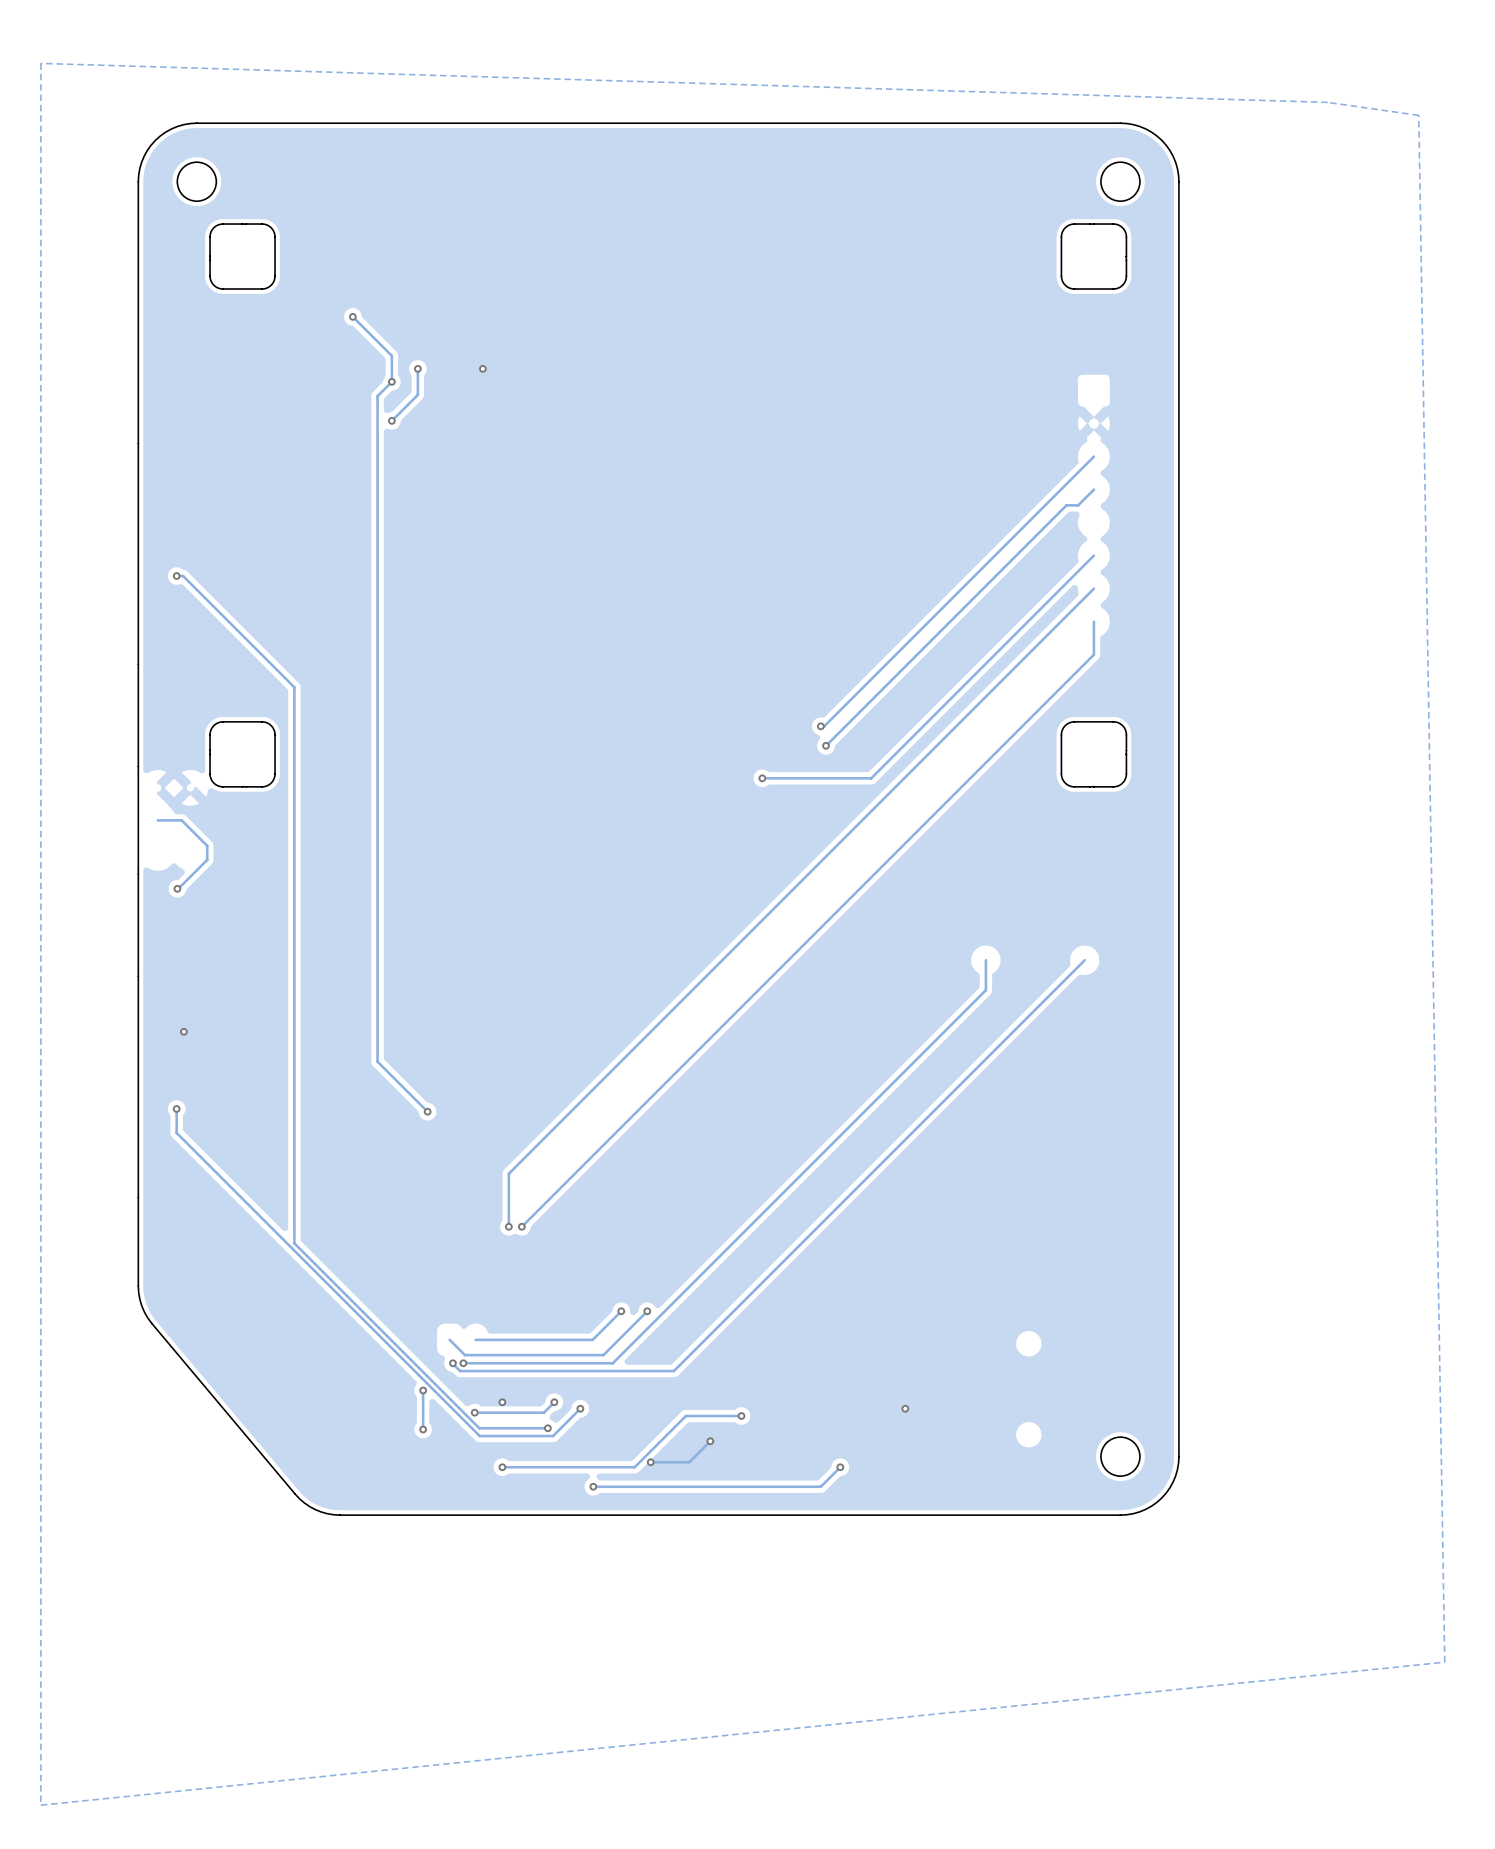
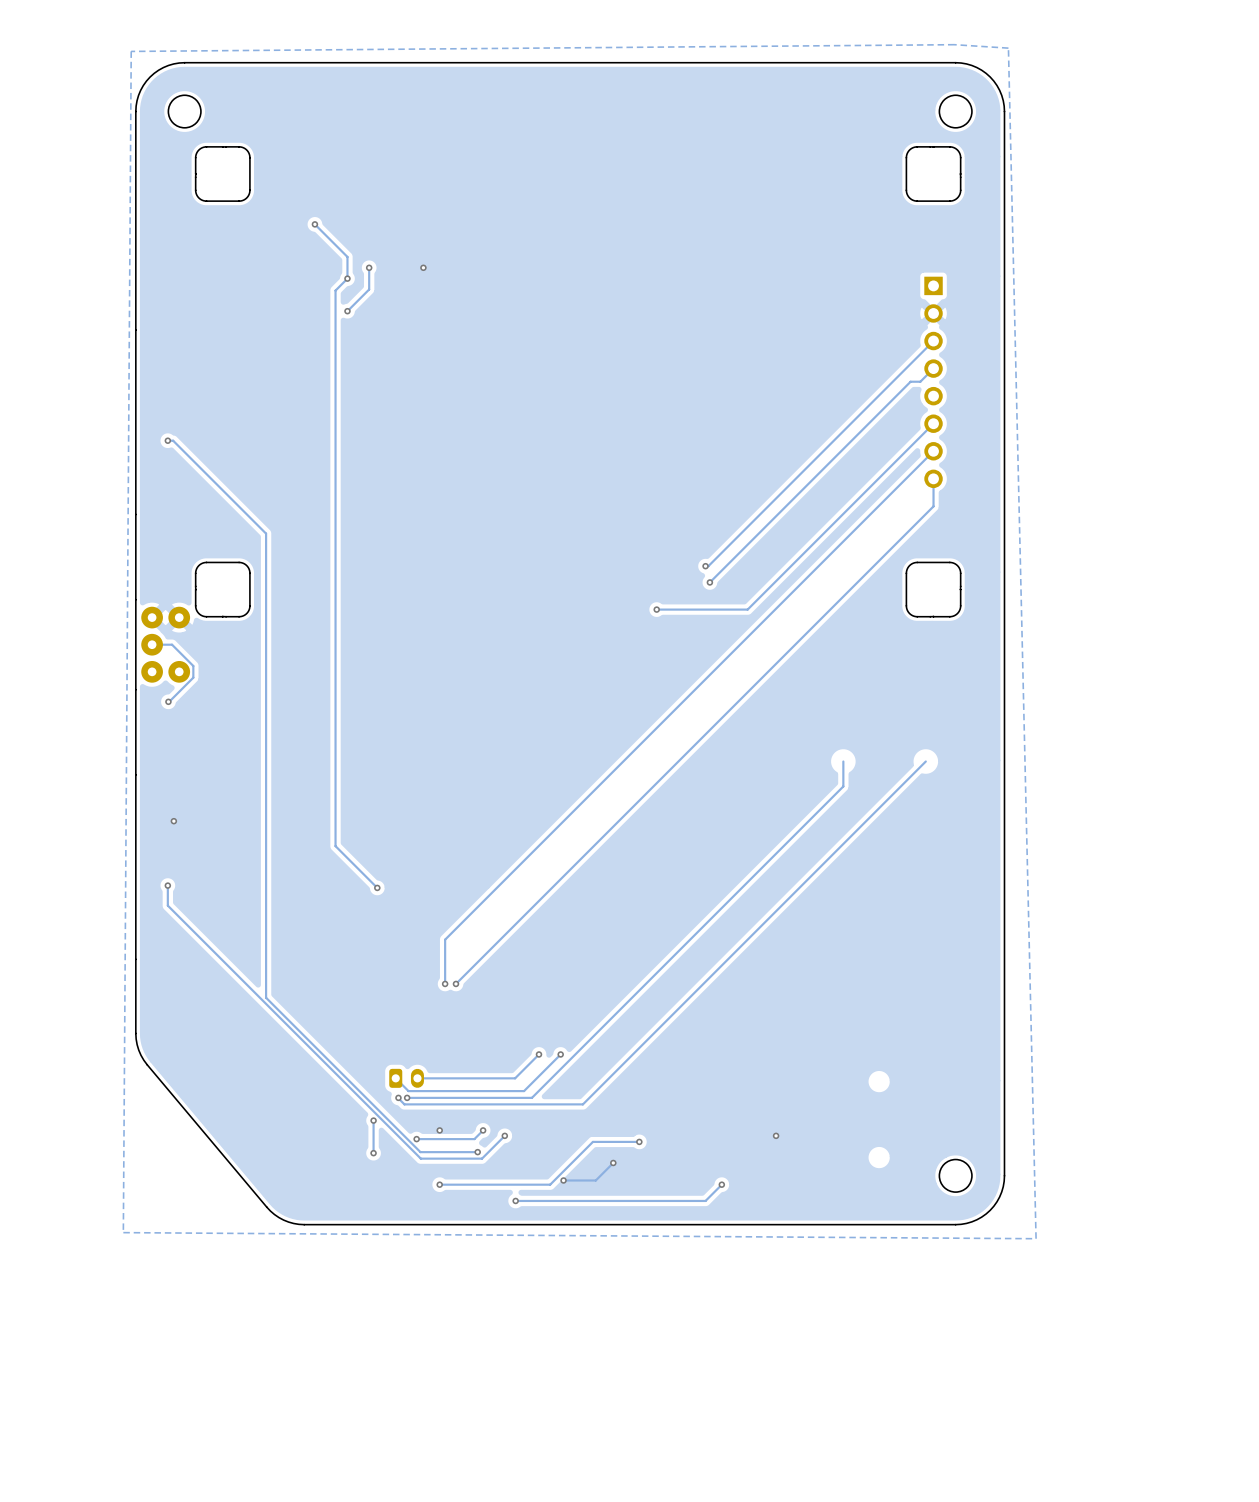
zone outline: (40, 63) (1327, 102) (1418, 115) (1444, 1662) (40, 1805) (40, 63) -> (954, 44) (1008, 48) (1036, 1238) (123, 1232) (131, 51) (954, 44)
part: none -> (933, 382)
part: none -> (165, 644)
part: none -> (406, 1078)

